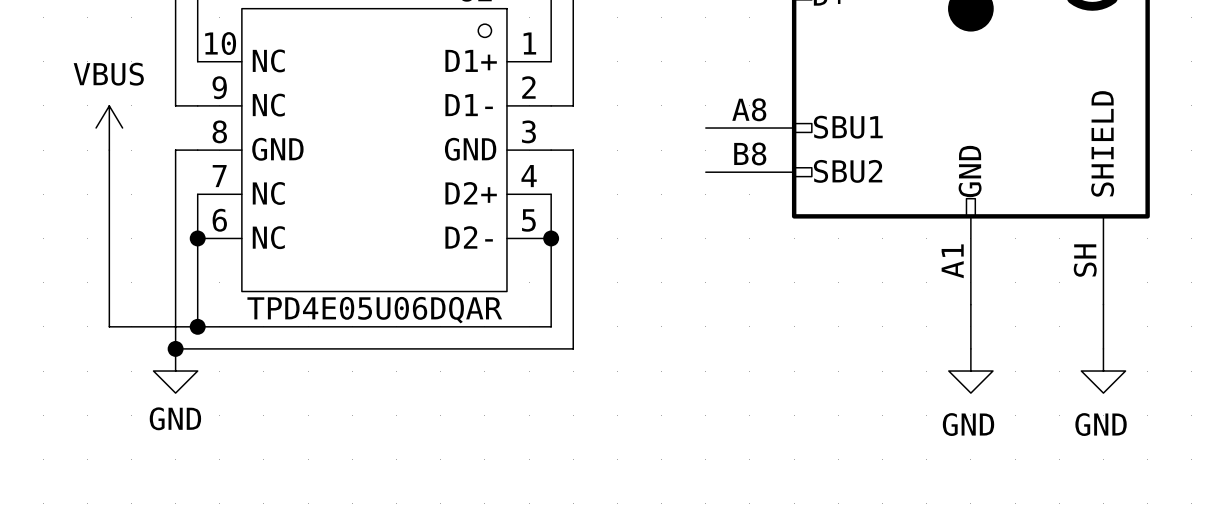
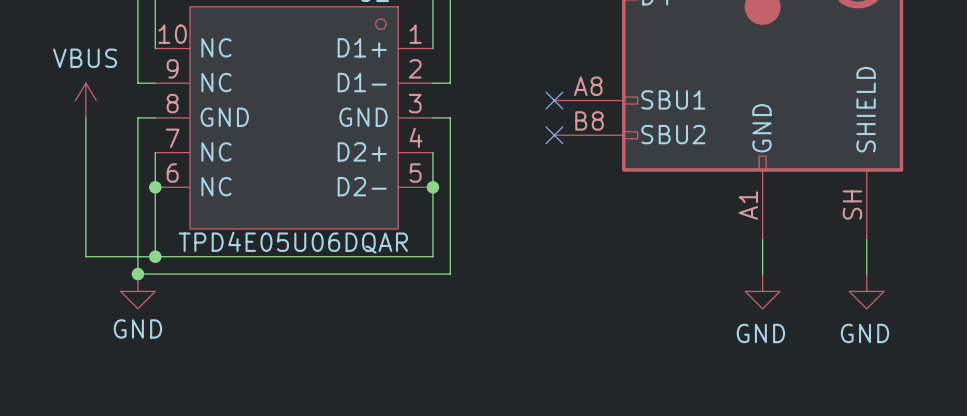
no-connect mark: none -> (554, 100)
no-connect mark: none -> (554, 135)

